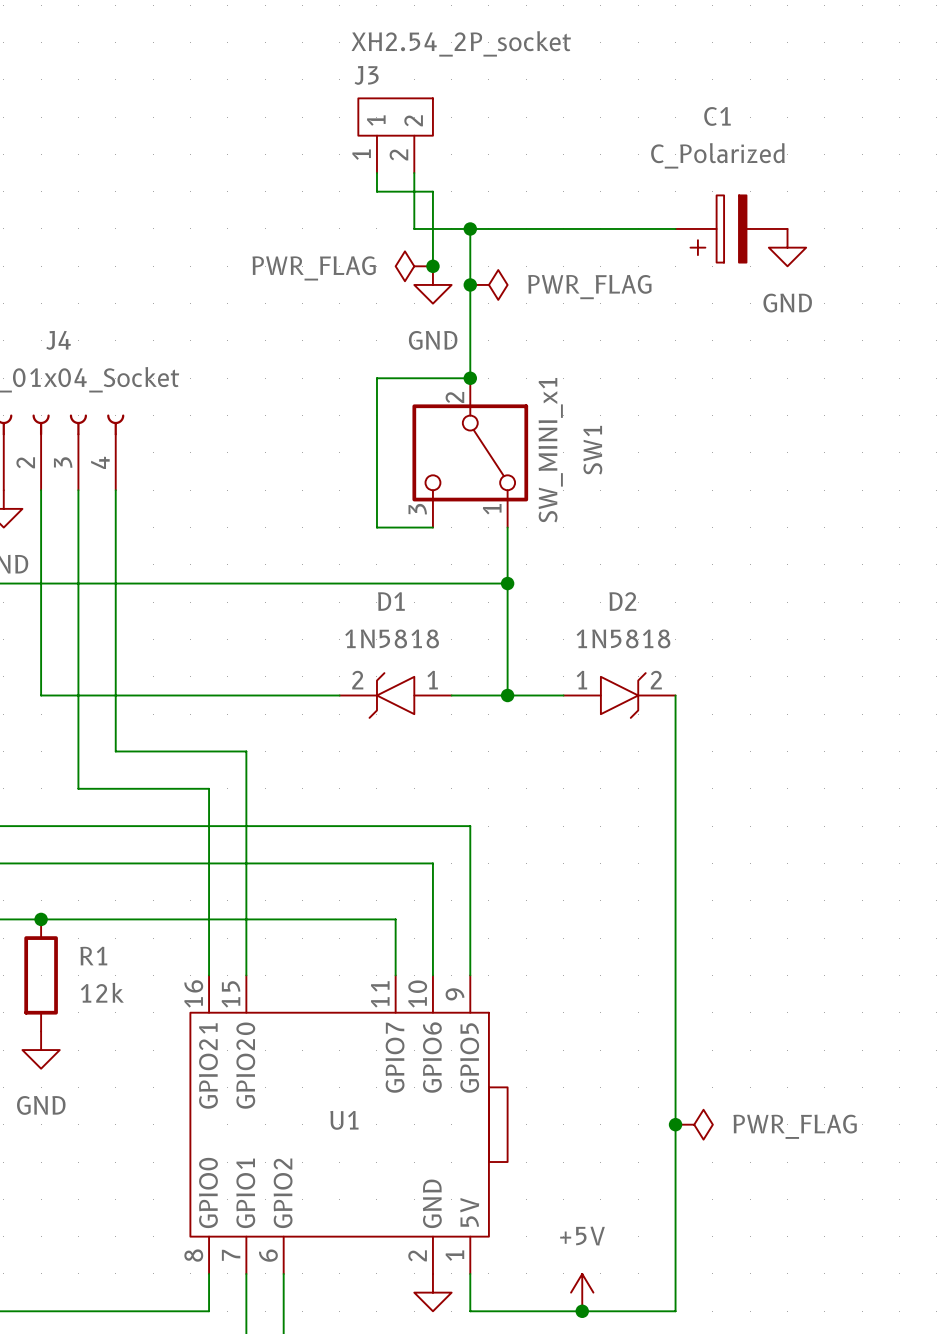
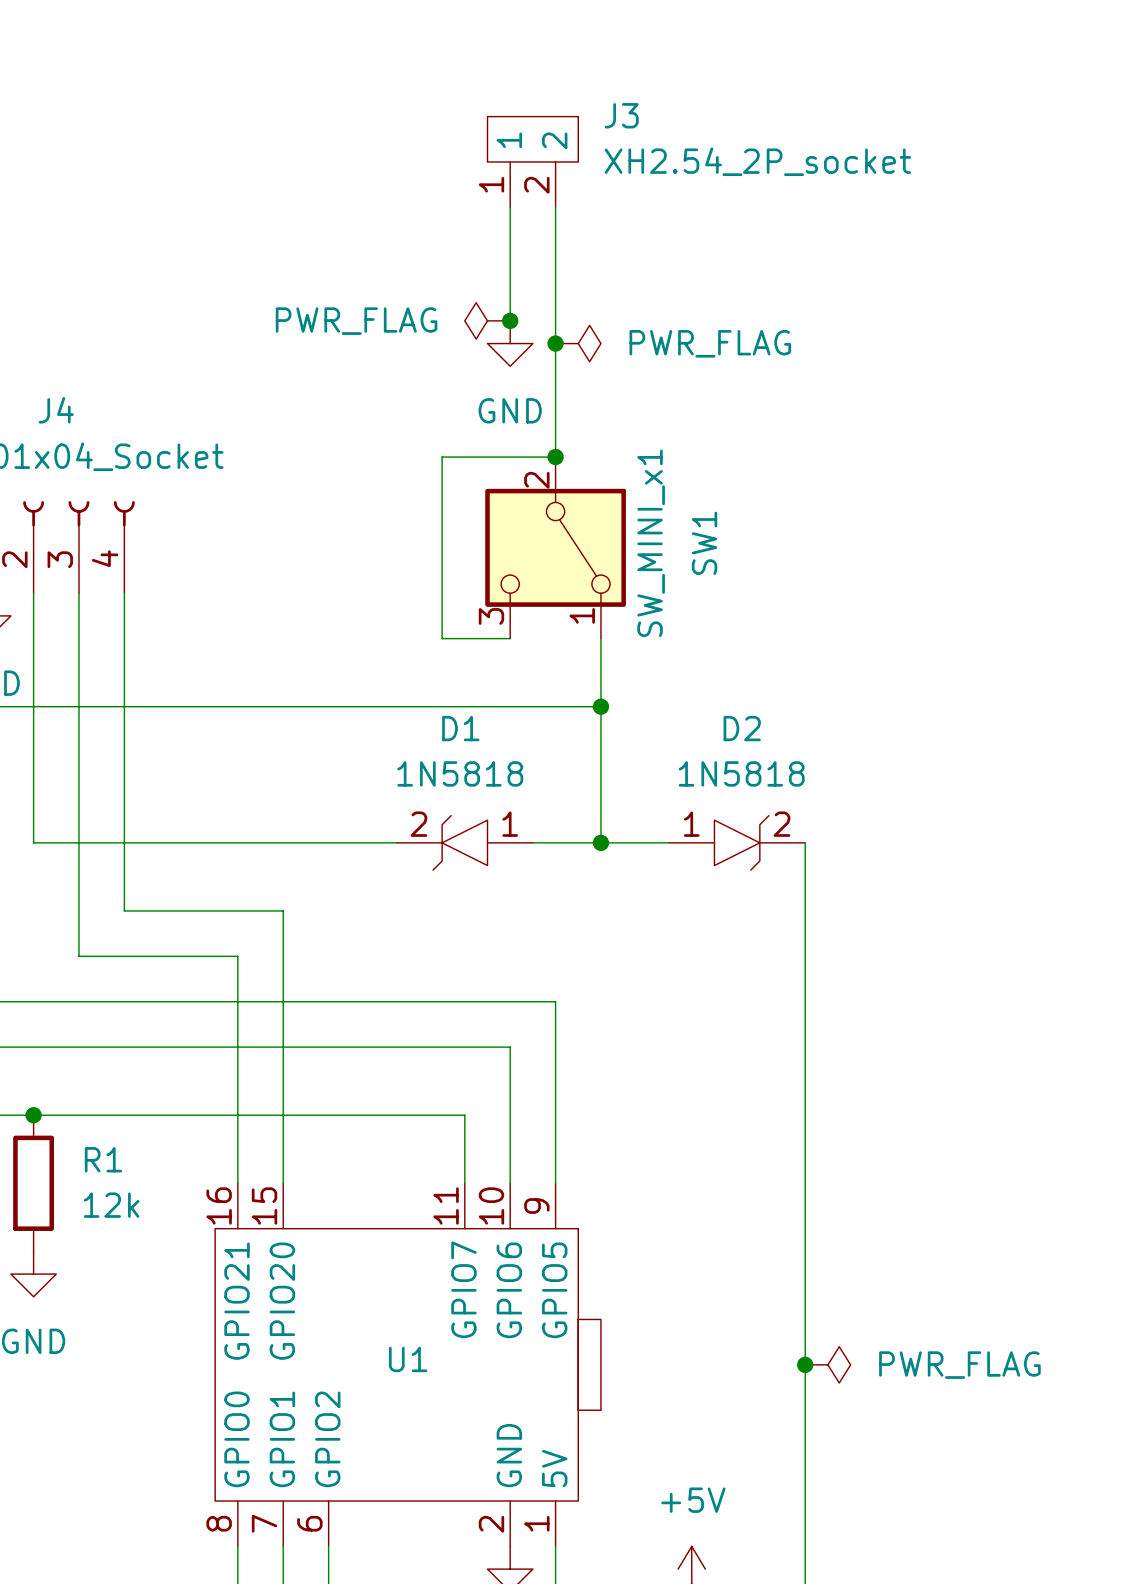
J3 value position: XH2.54_2P_socket (461, 43) -> XH2.54_2P_socket (757, 161)
J3 name position: J3 (366, 75) -> J3 (621, 115)
J3 position: (395, 135) -> (532, 162)
wire: (376, 173) (376, 191) (432, 191) -> (510, 207) (510, 230)
wire: (414, 173) (414, 228) (675, 228) -> none
wire: none -> (555, 207) (555, 275)
junction: (470, 228) -> none
C1: C_Polarized (731, 228) -> none
power symbol: GND (787, 247) -> none

